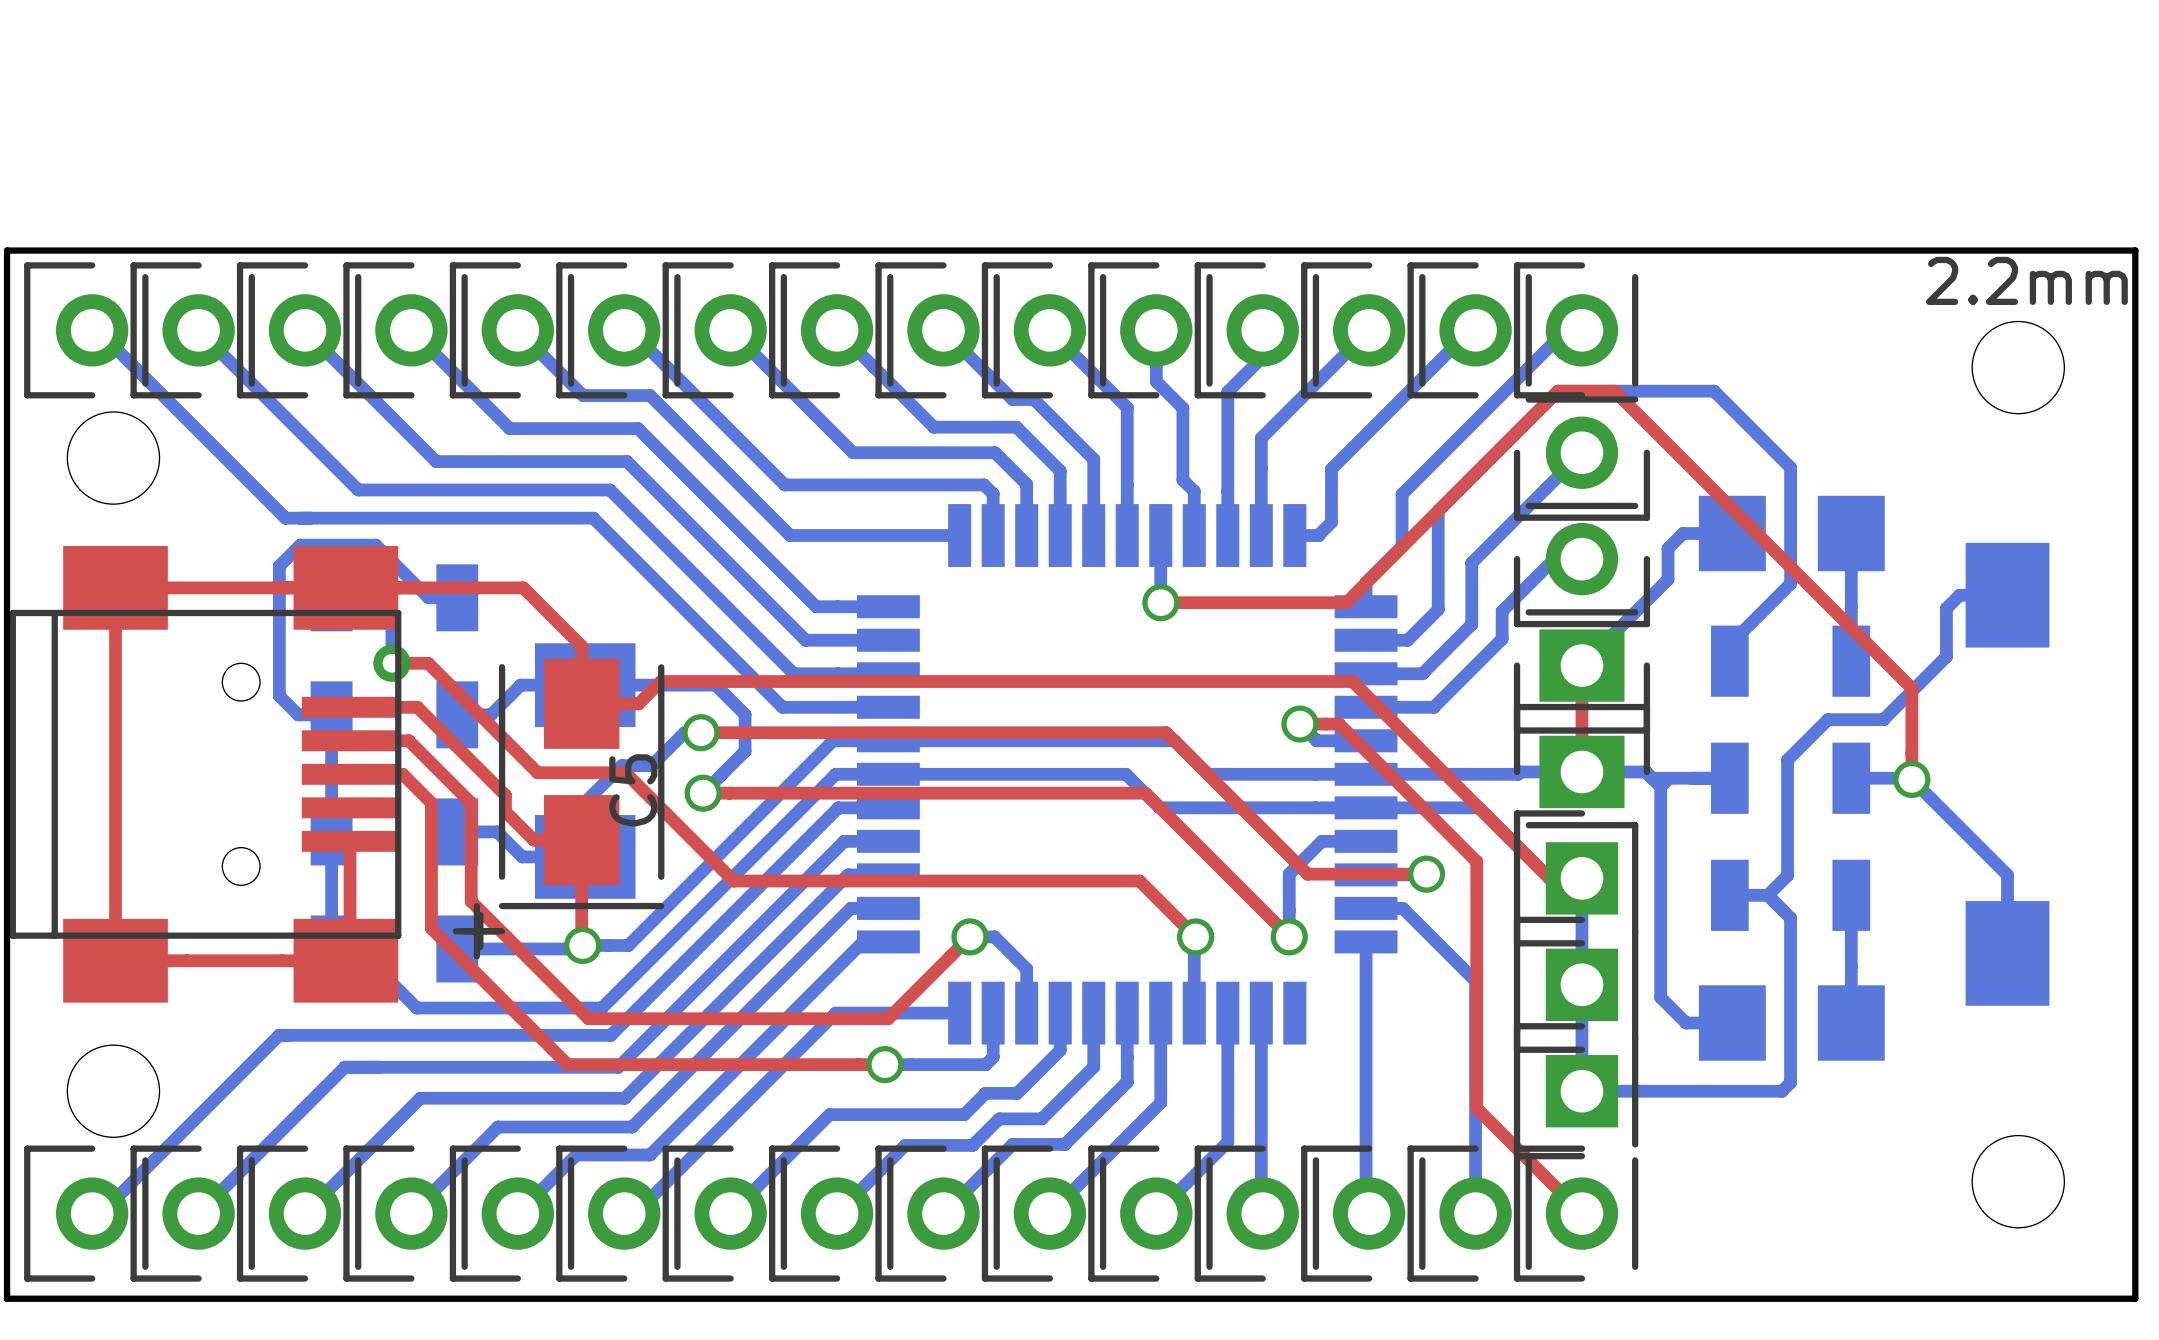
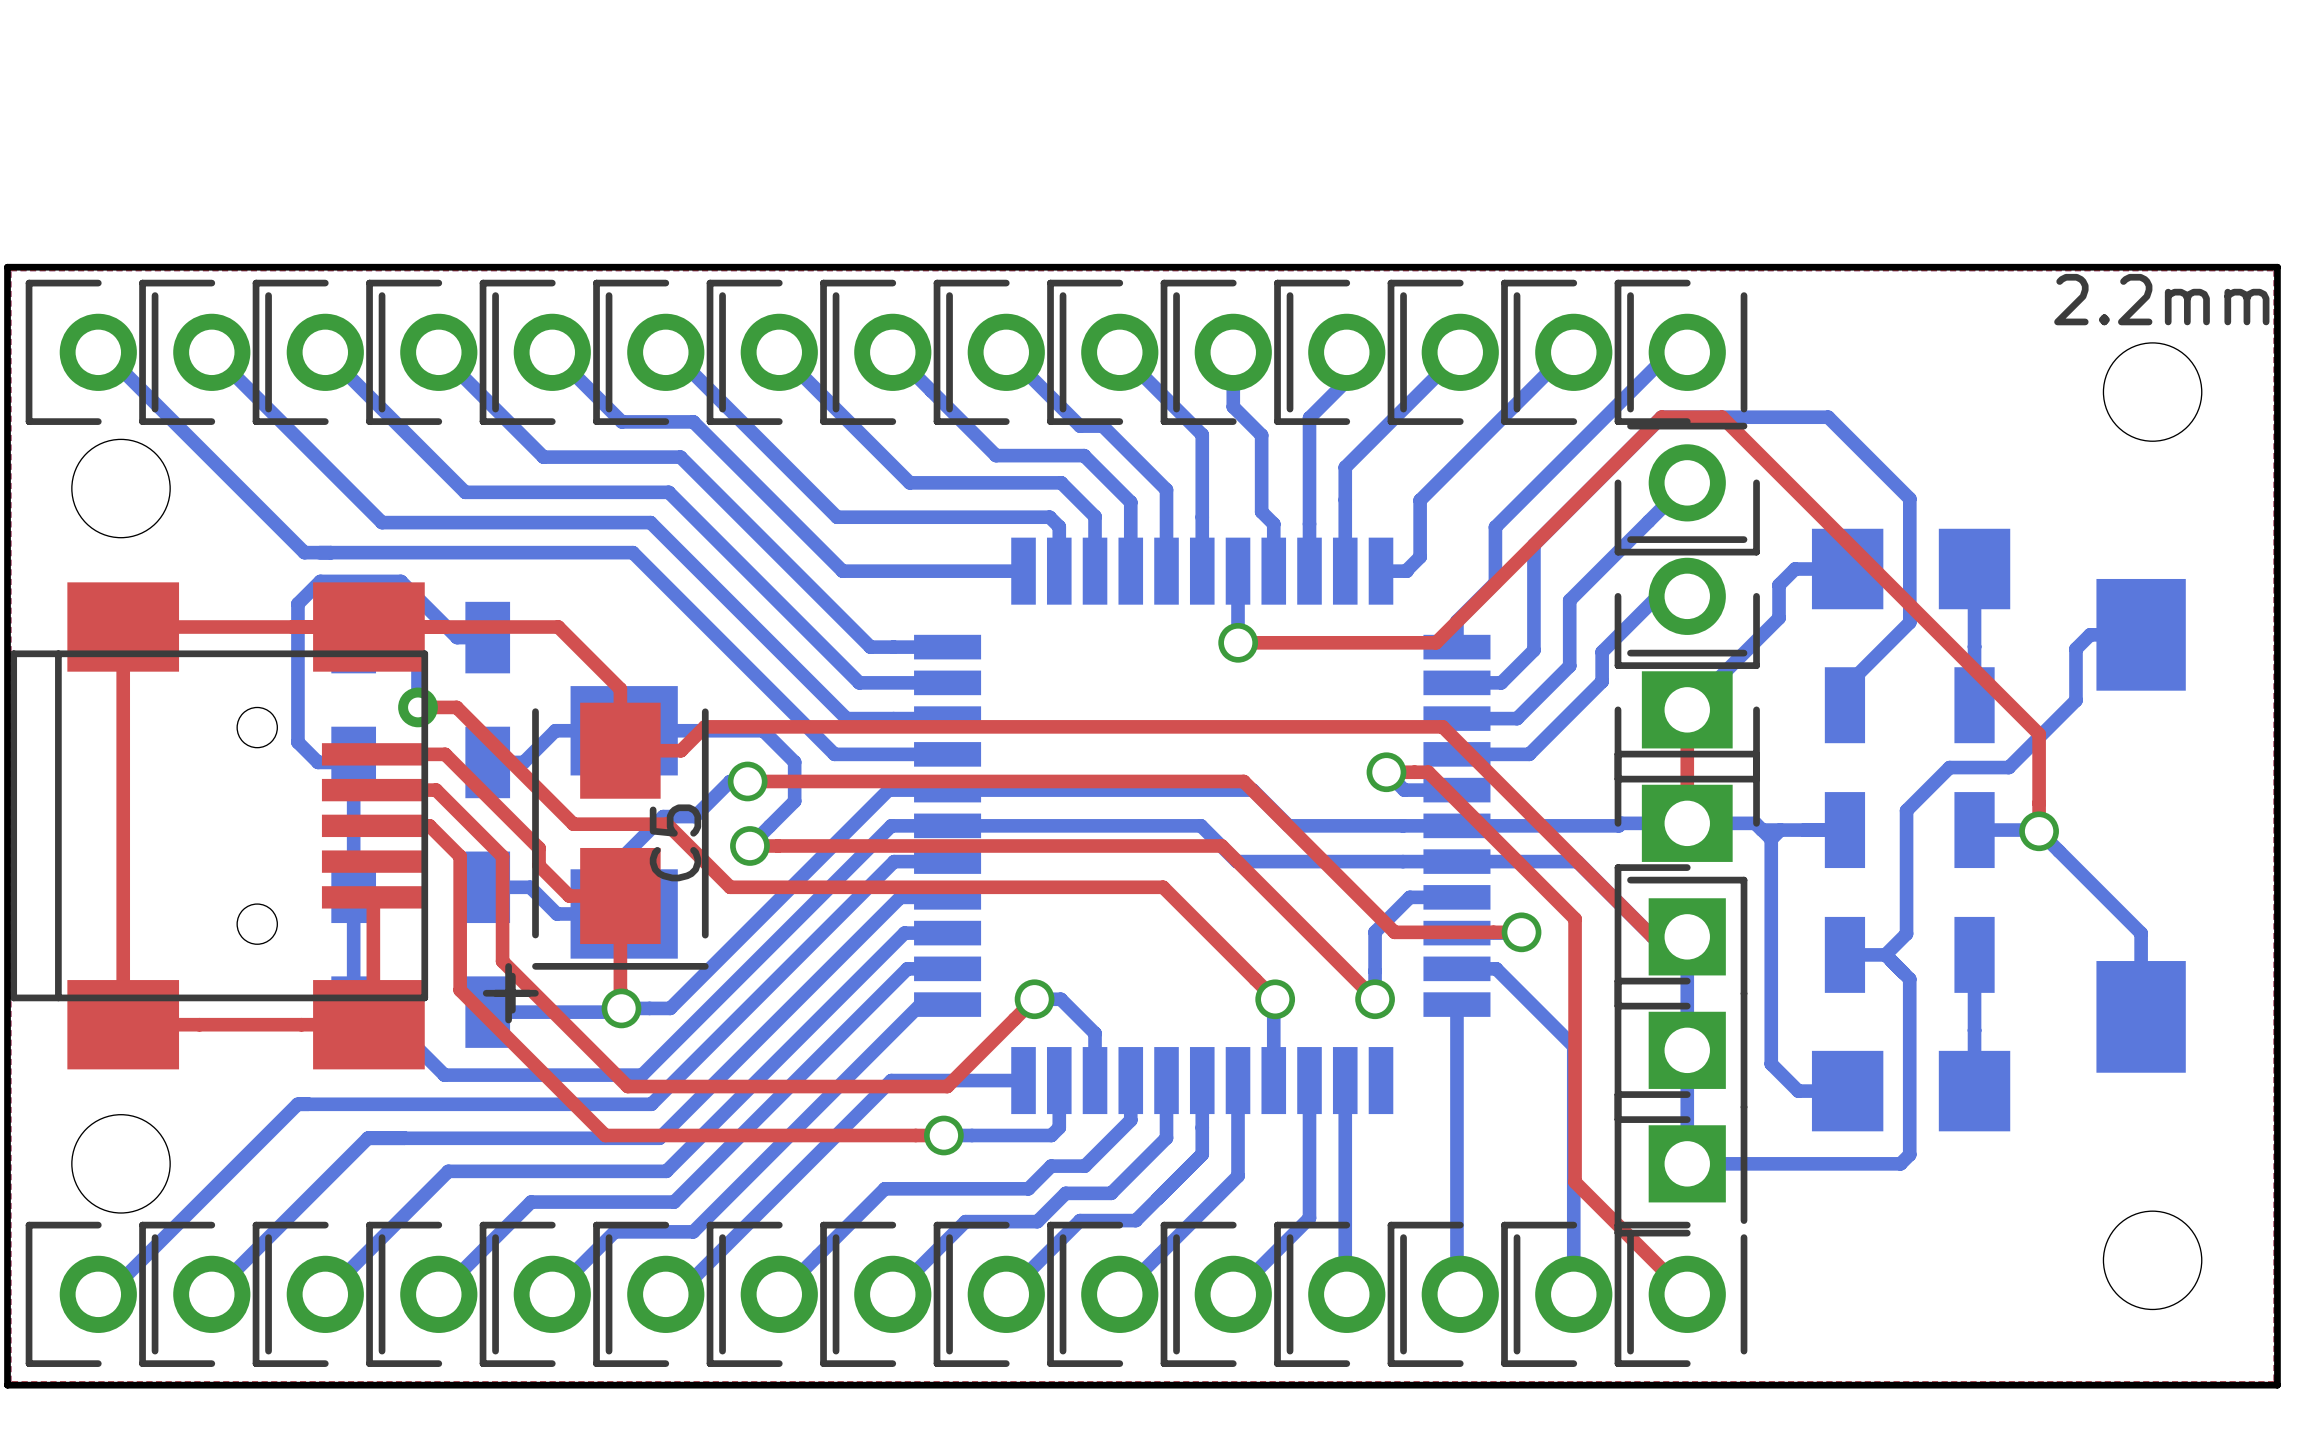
top zone outline: none -> (10, 270) (2274, 270) (2274, 1381) (10, 1381) (10, 270)
top track: (684, 831) (733, 881) (1139, 881) -> (730, 887) (1163, 887) (1215, 939)

